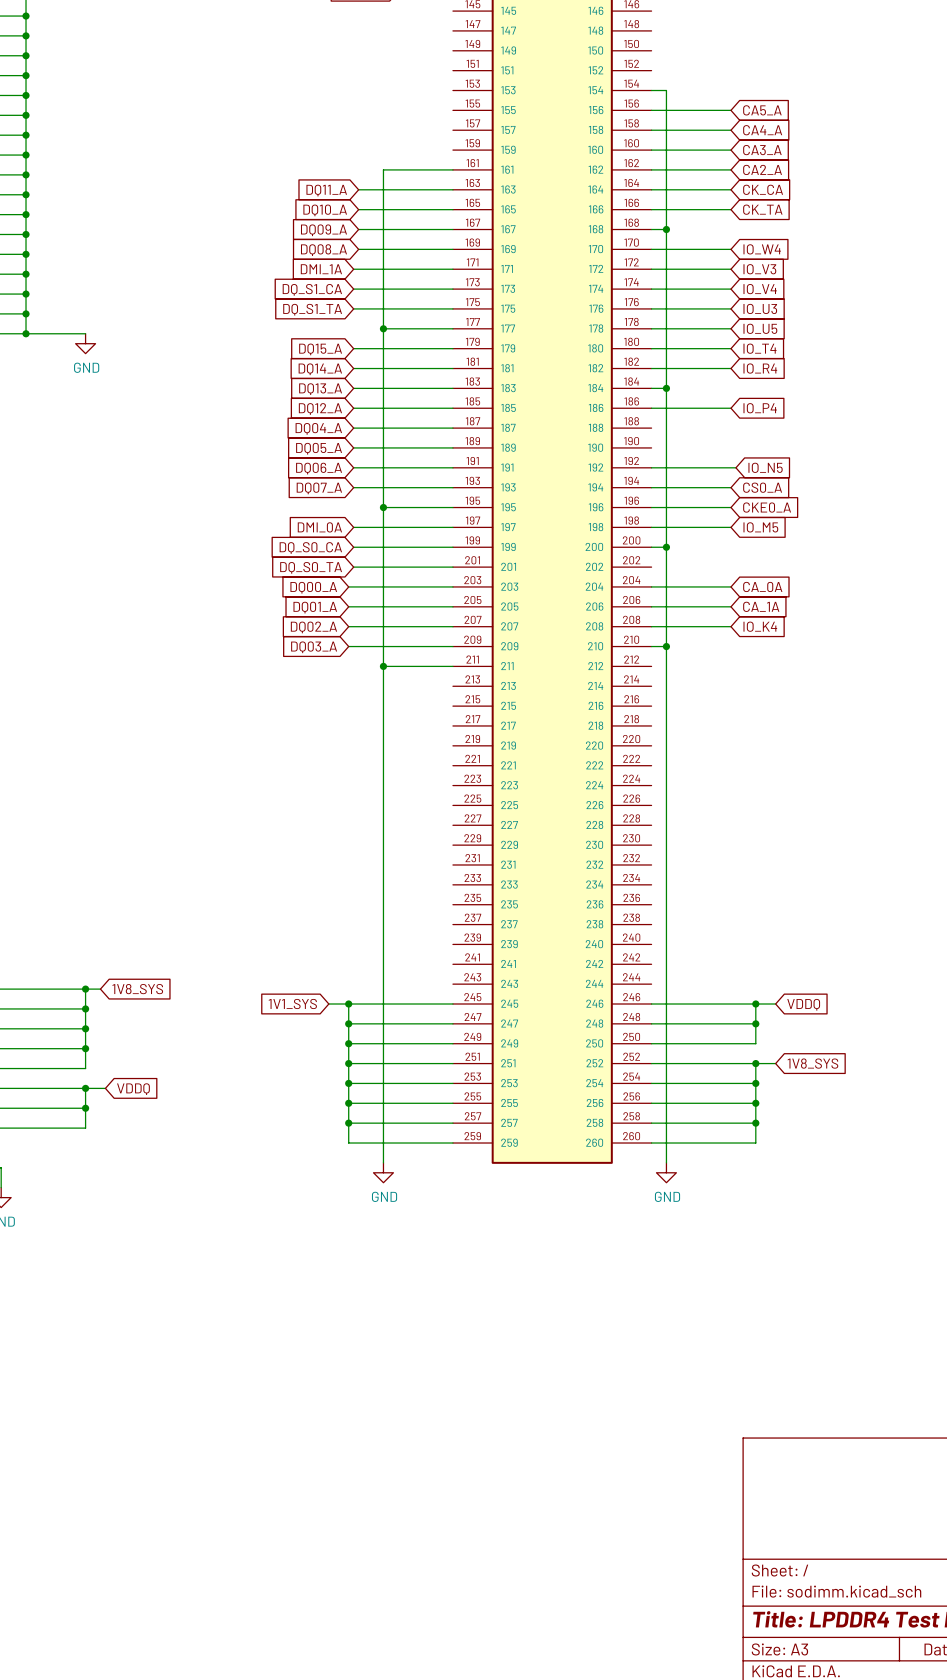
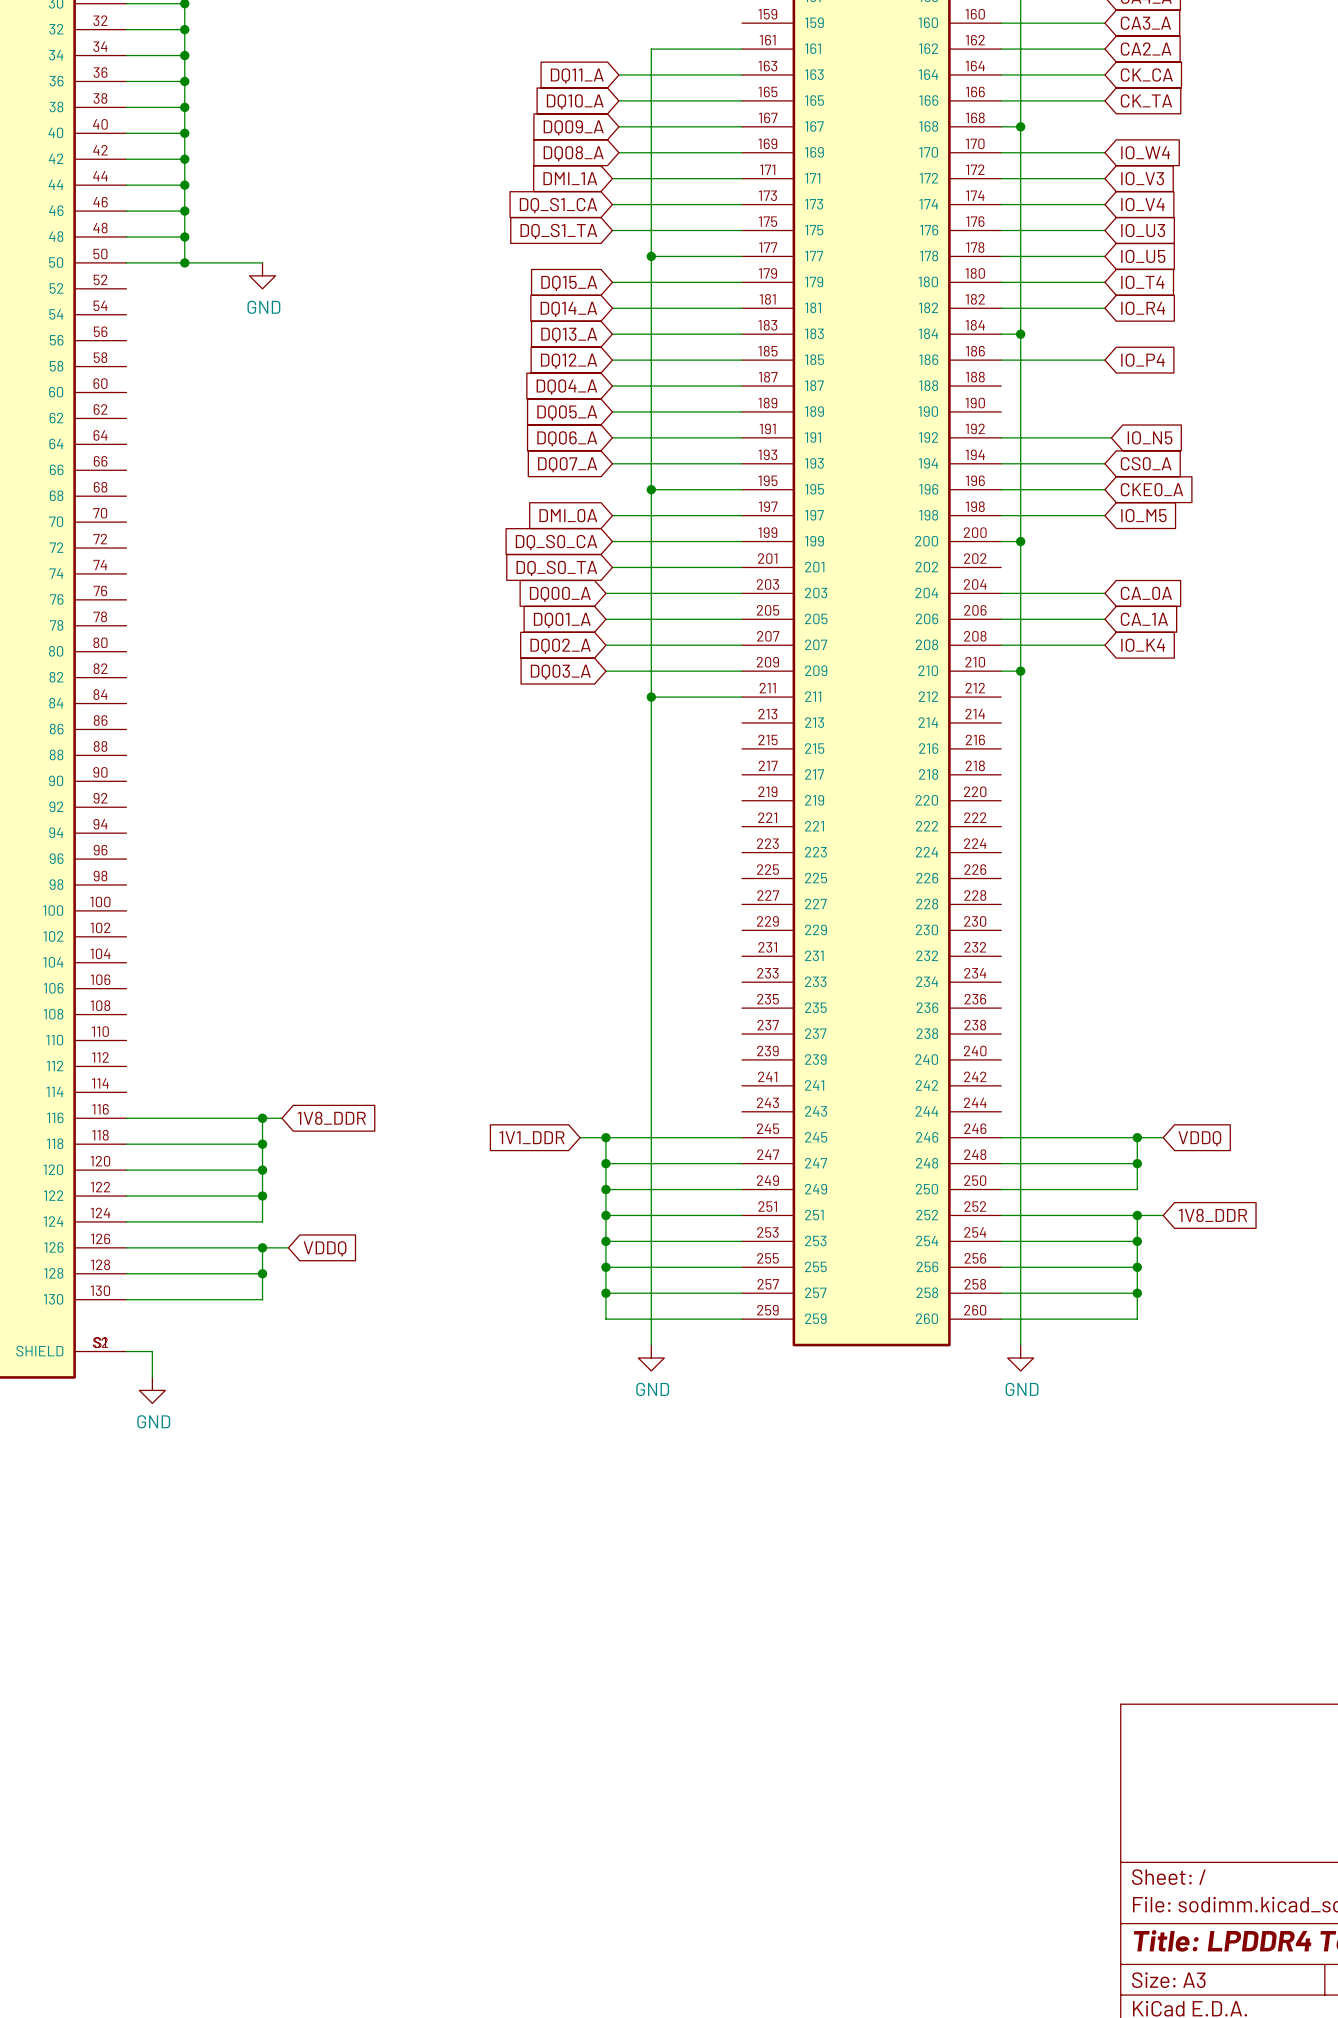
global label: 1V8_SYS (137, 989) -> 1V8_DDR (331, 1118)
global label: 1V1_SYS (292, 1003) -> 1V1_DDR (532, 1137)
global label: 1V8_SYS (812, 1063) -> 1V8_DDR (1213, 1215)

